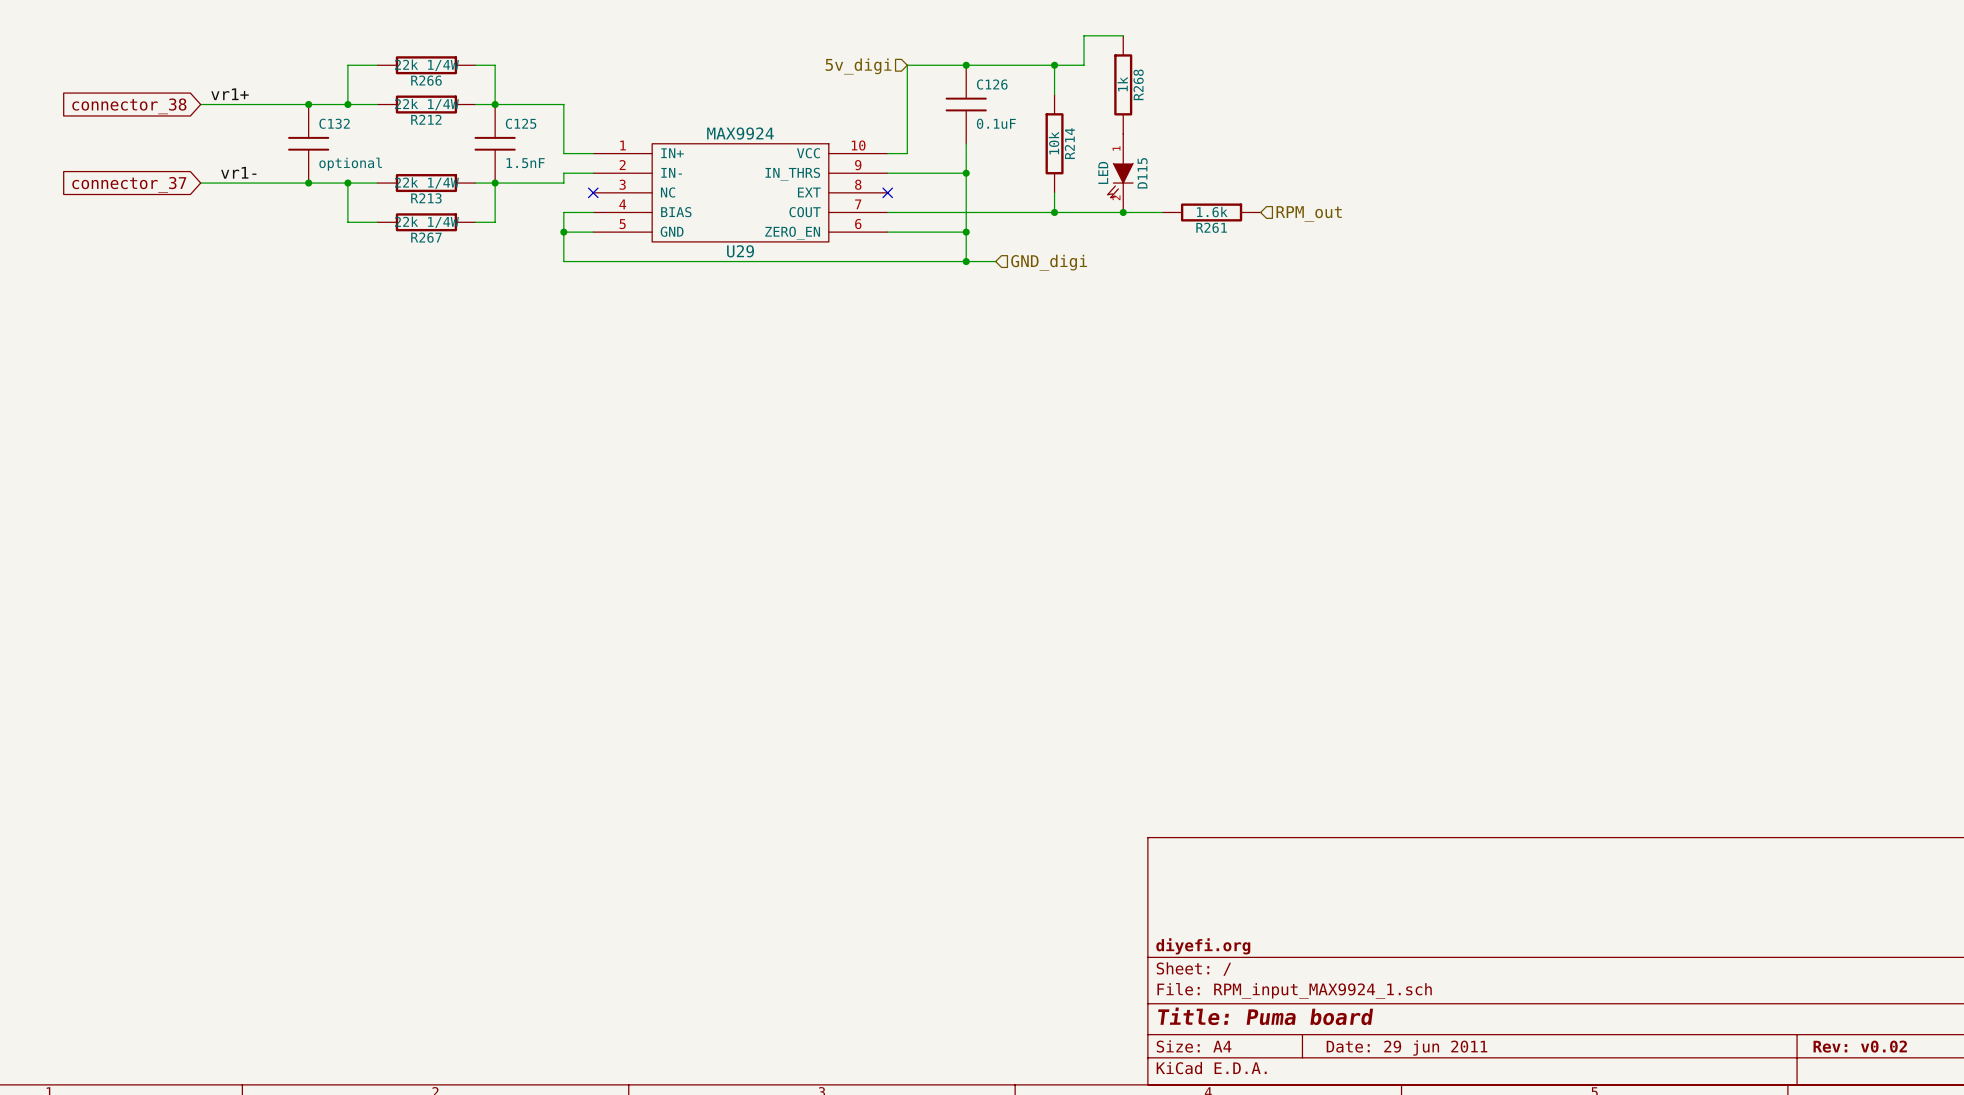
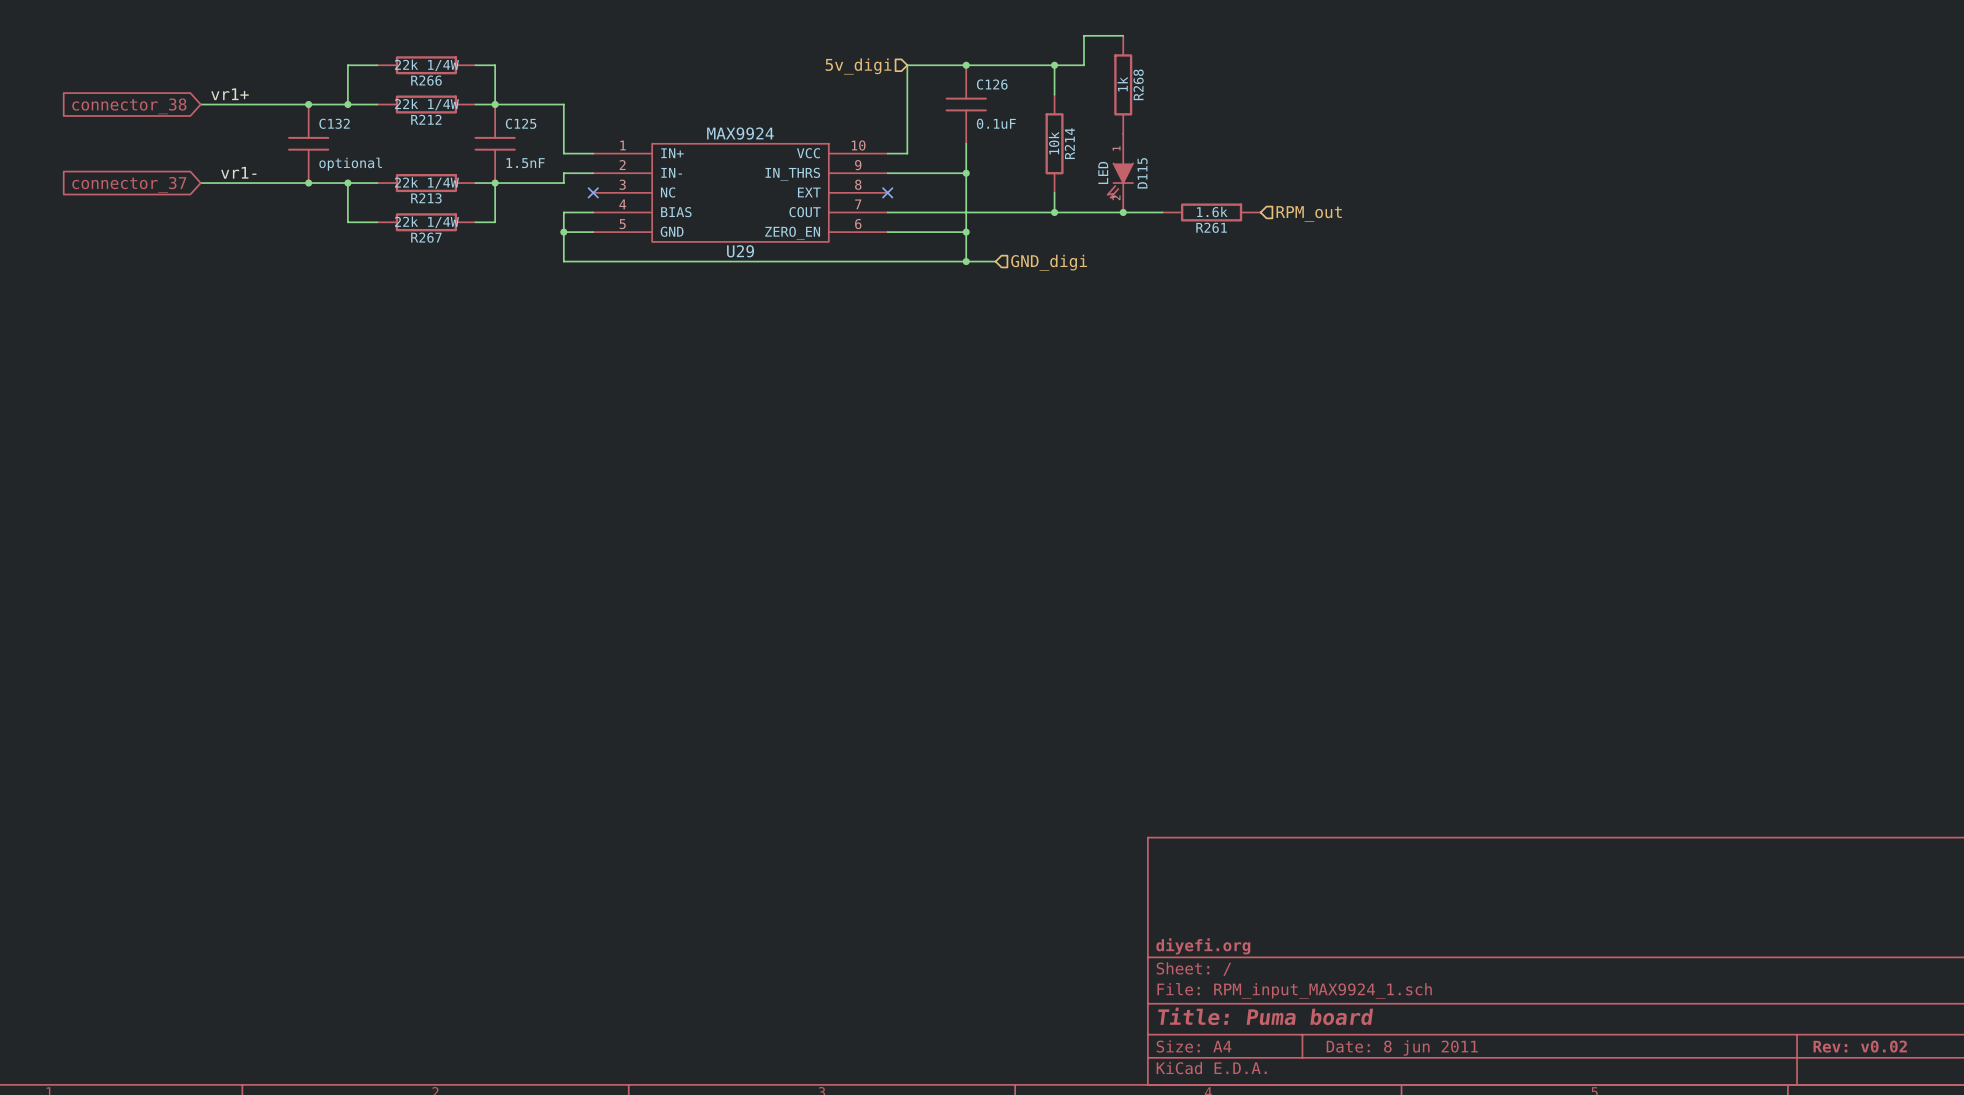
title block: Date: 29 jun 2011 (1407, 1047) -> Date: 8 jun 2011 (1402, 1047)

